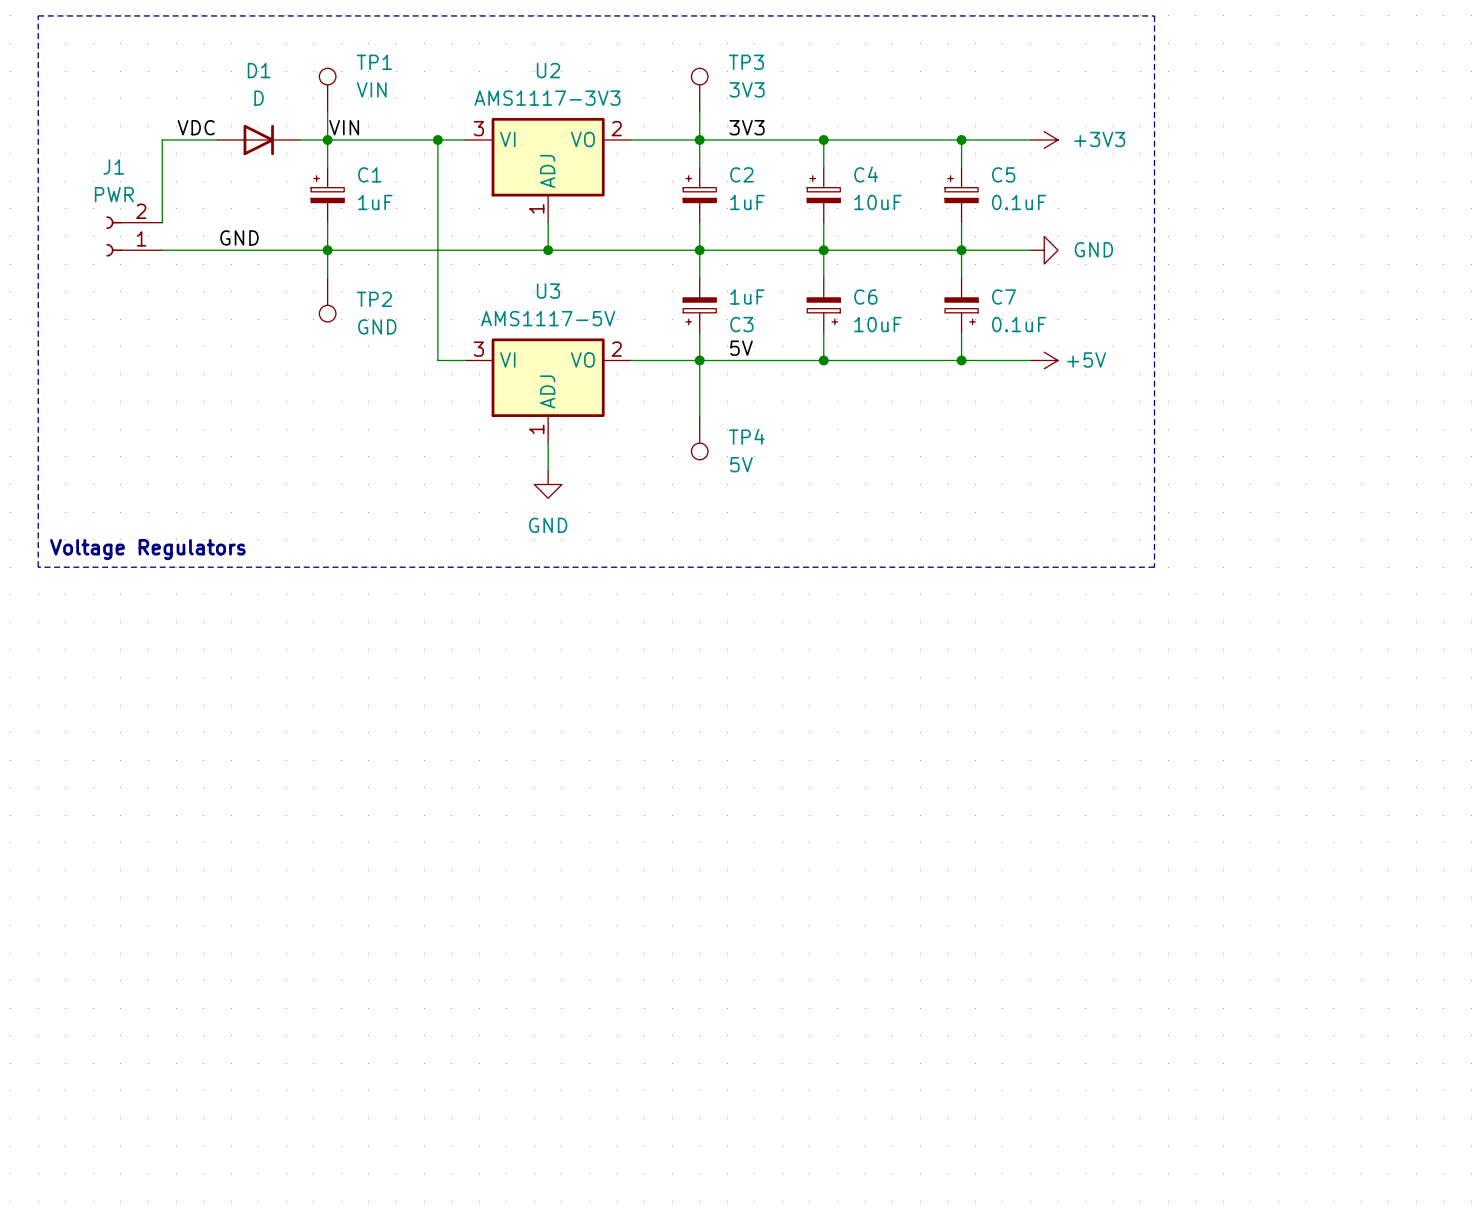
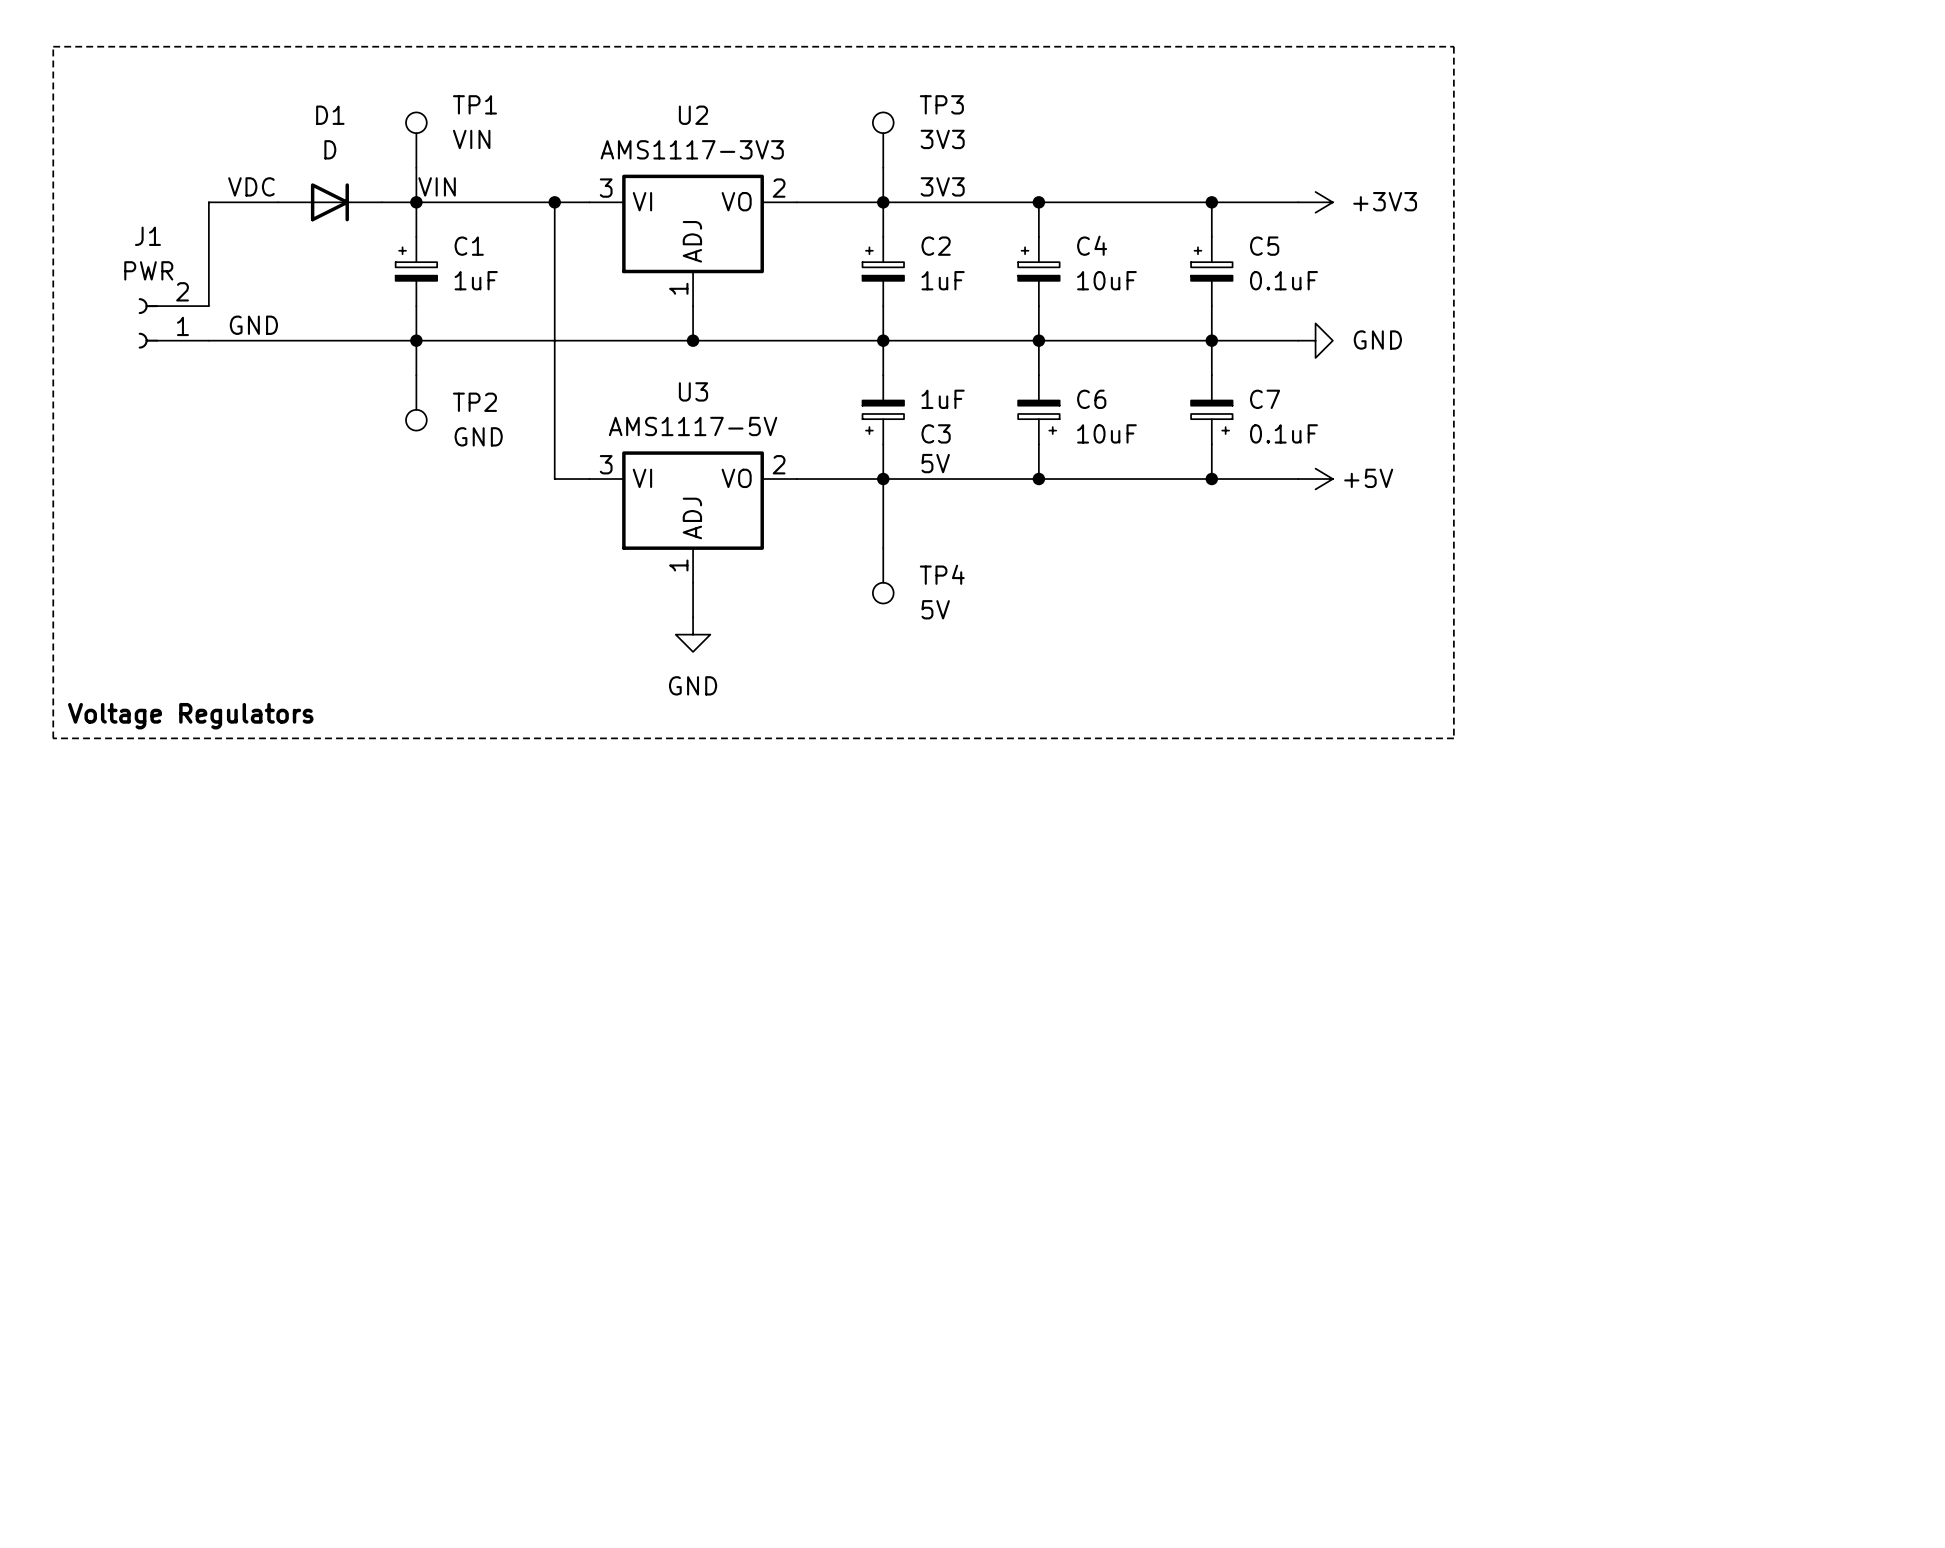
label position: GND (239, 237) -> GND (253, 325)

